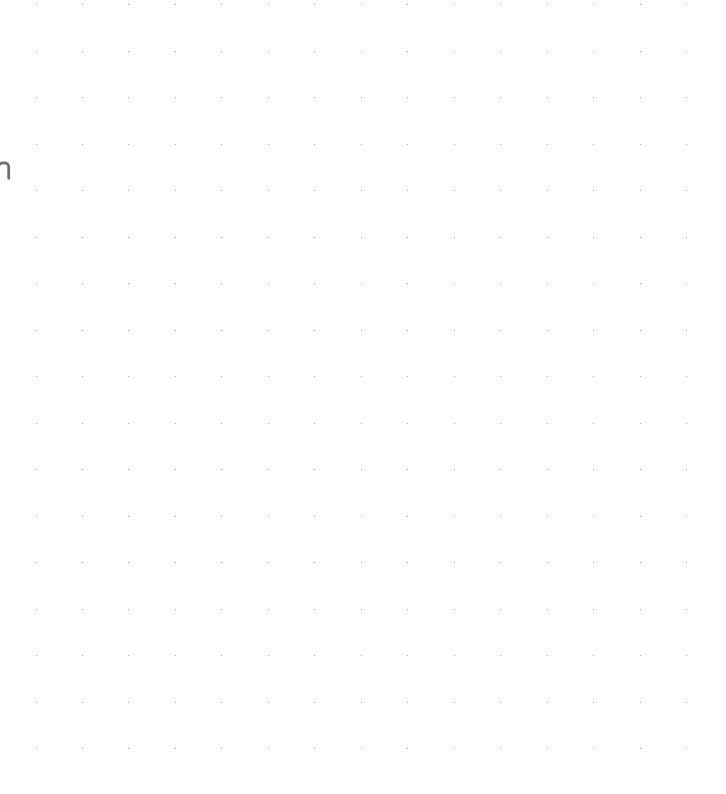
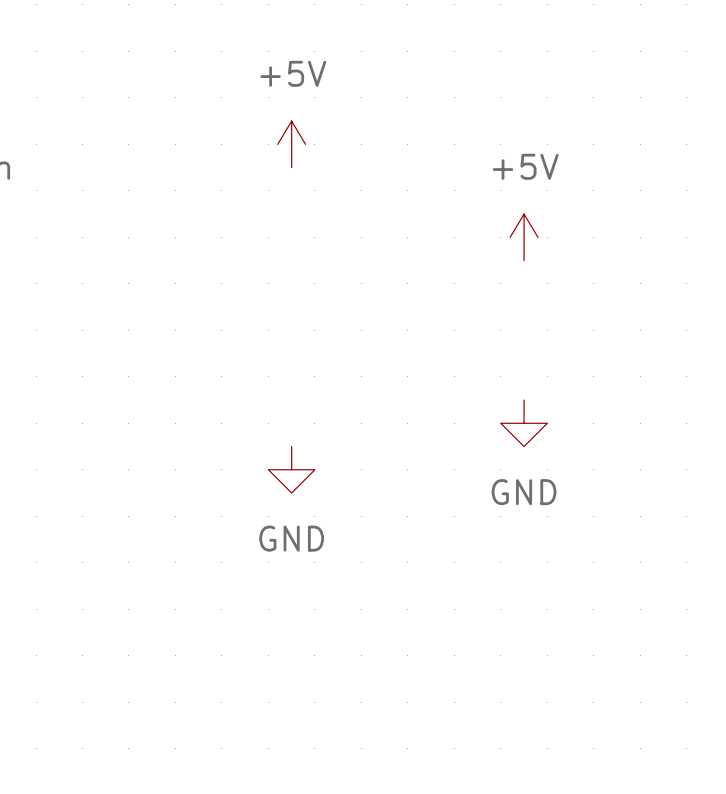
power symbol: none -> +5V (291, 144)
power symbol: none -> +5V (524, 237)
power symbol: none -> GND (524, 423)
power symbol: none -> GND (291, 469)

